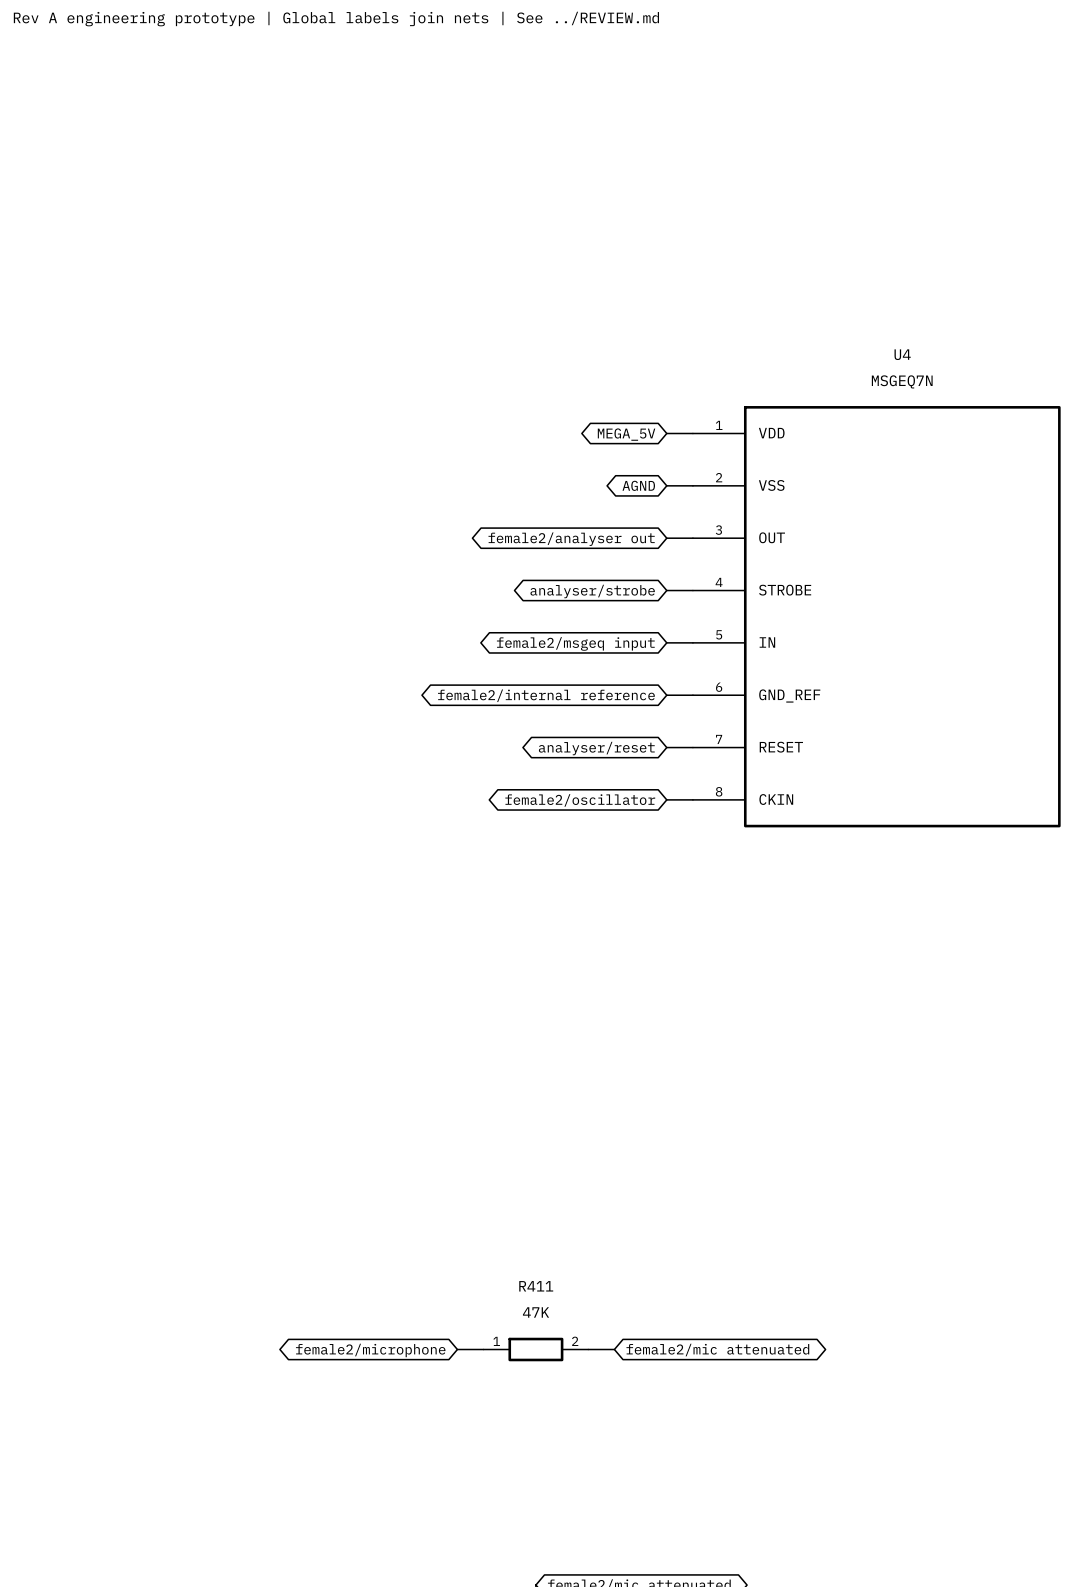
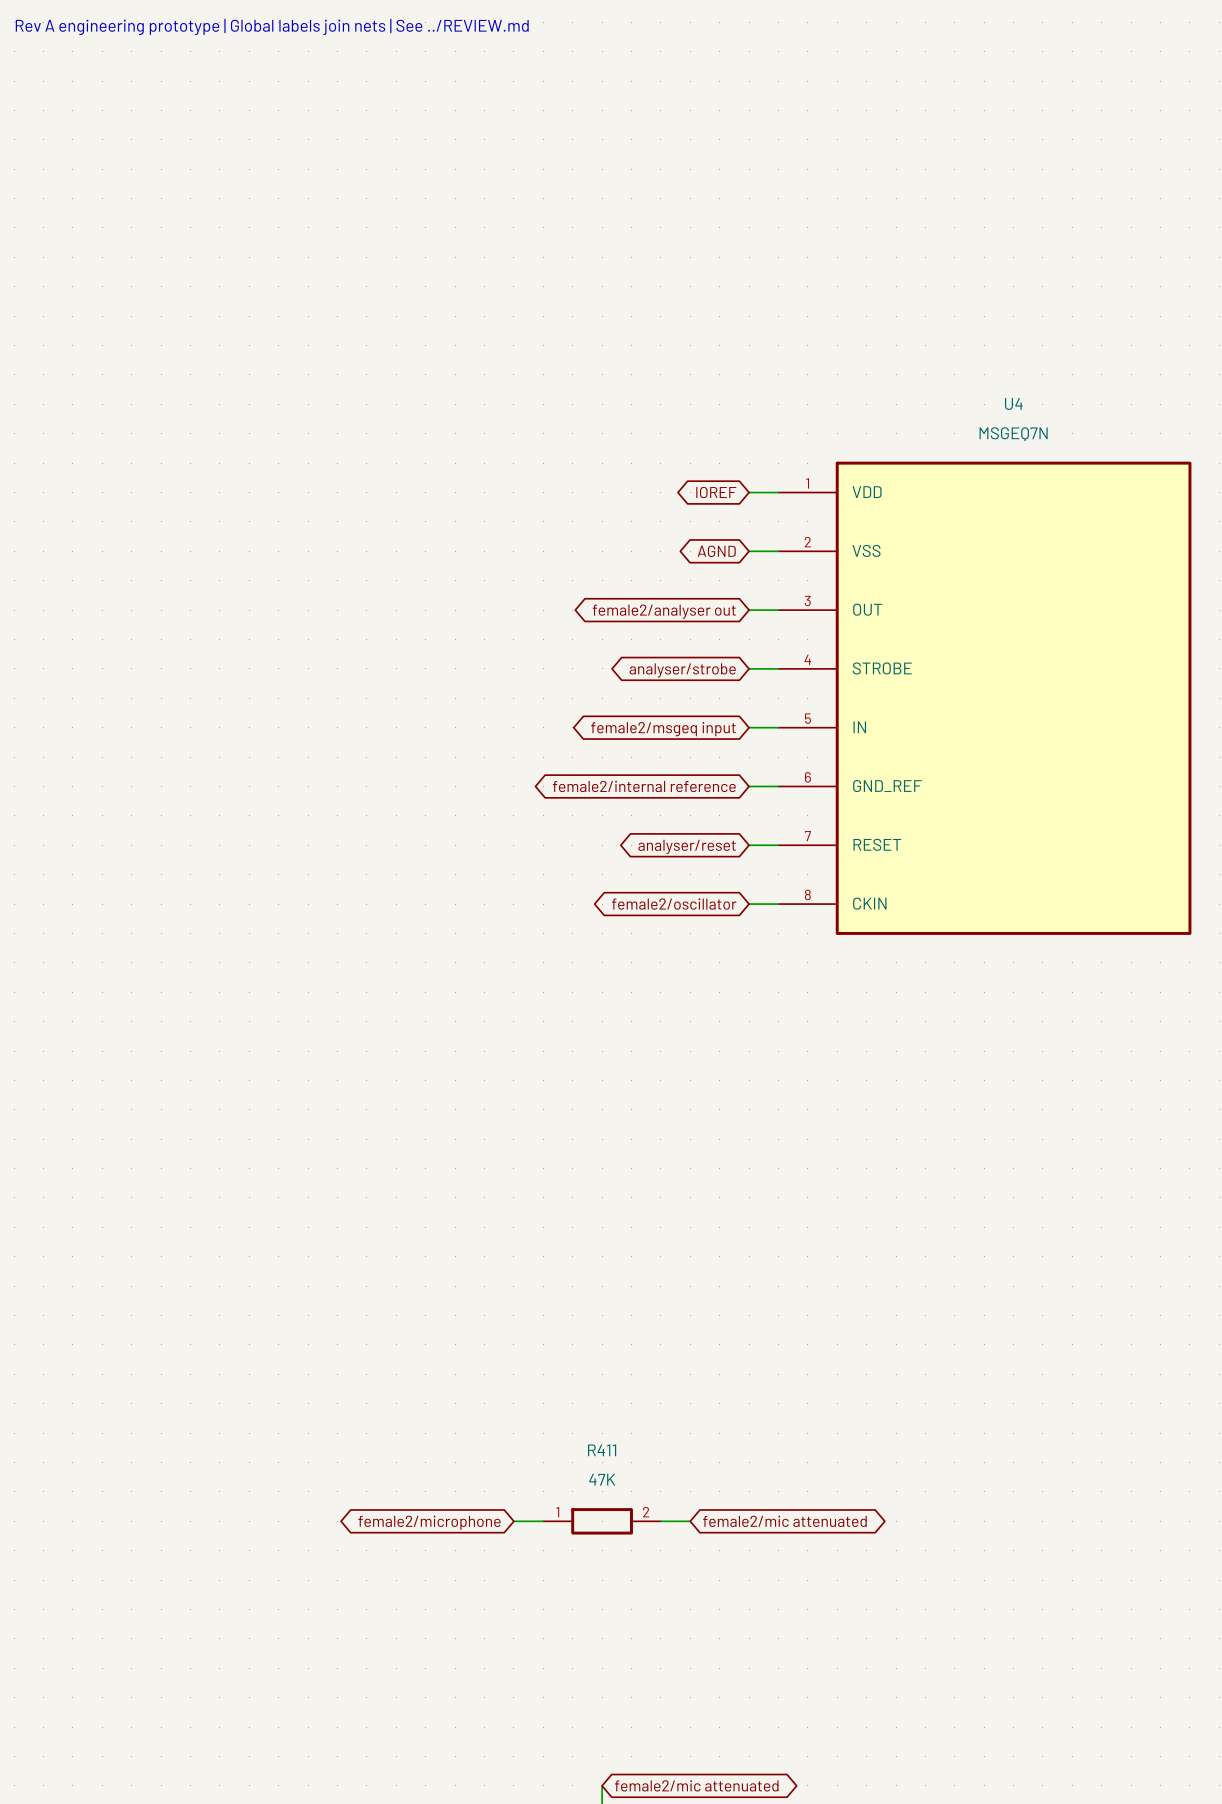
global label: MEGA_5V (626, 434) -> IOREF (716, 492)

